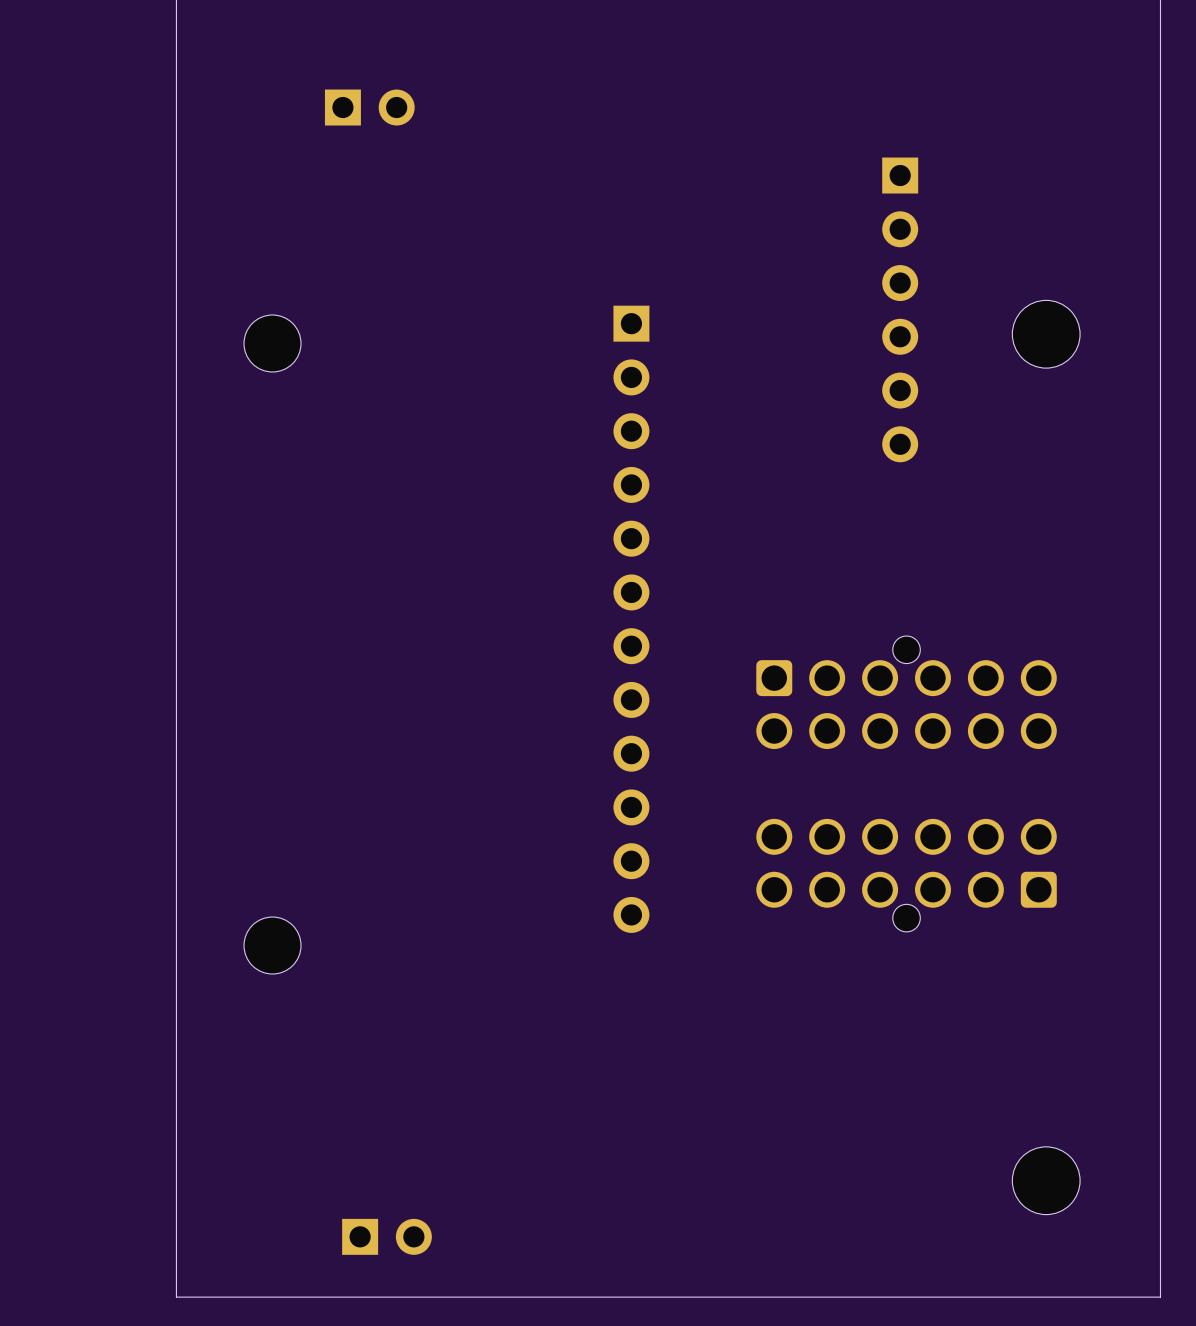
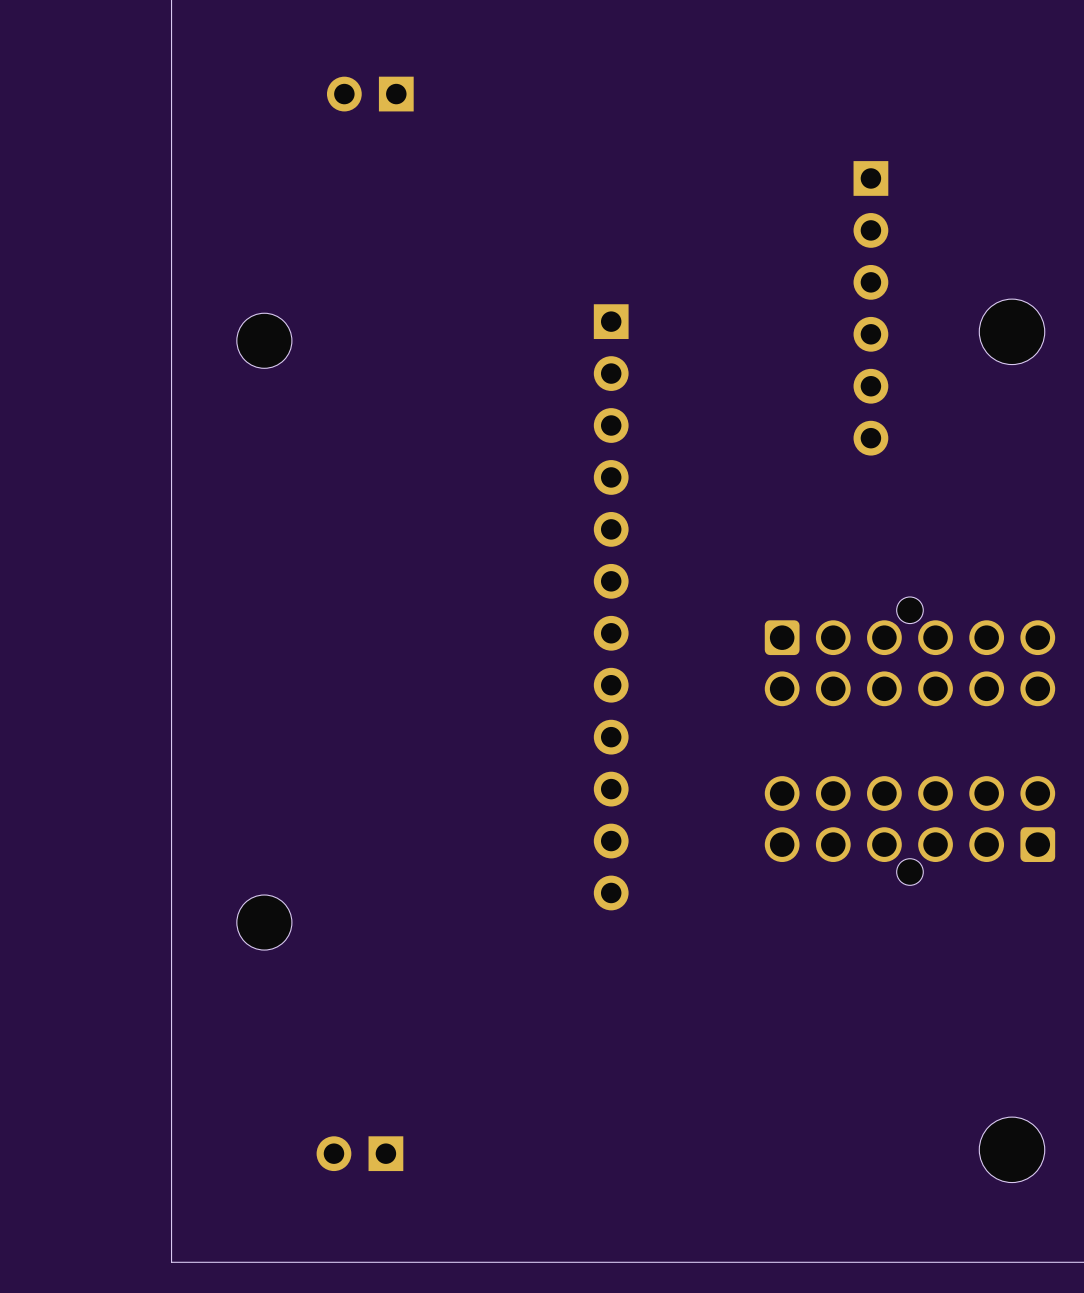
part rotation: 0° (369, 107) -> 180° (370, 94)
part position: (906, 692) -> (909, 651)
part position: (906, 875) -> (909, 830)
part rotation: 0° (387, 1236) -> 180° (359, 1153)
part position: (387, 1236) -> (359, 1153)

